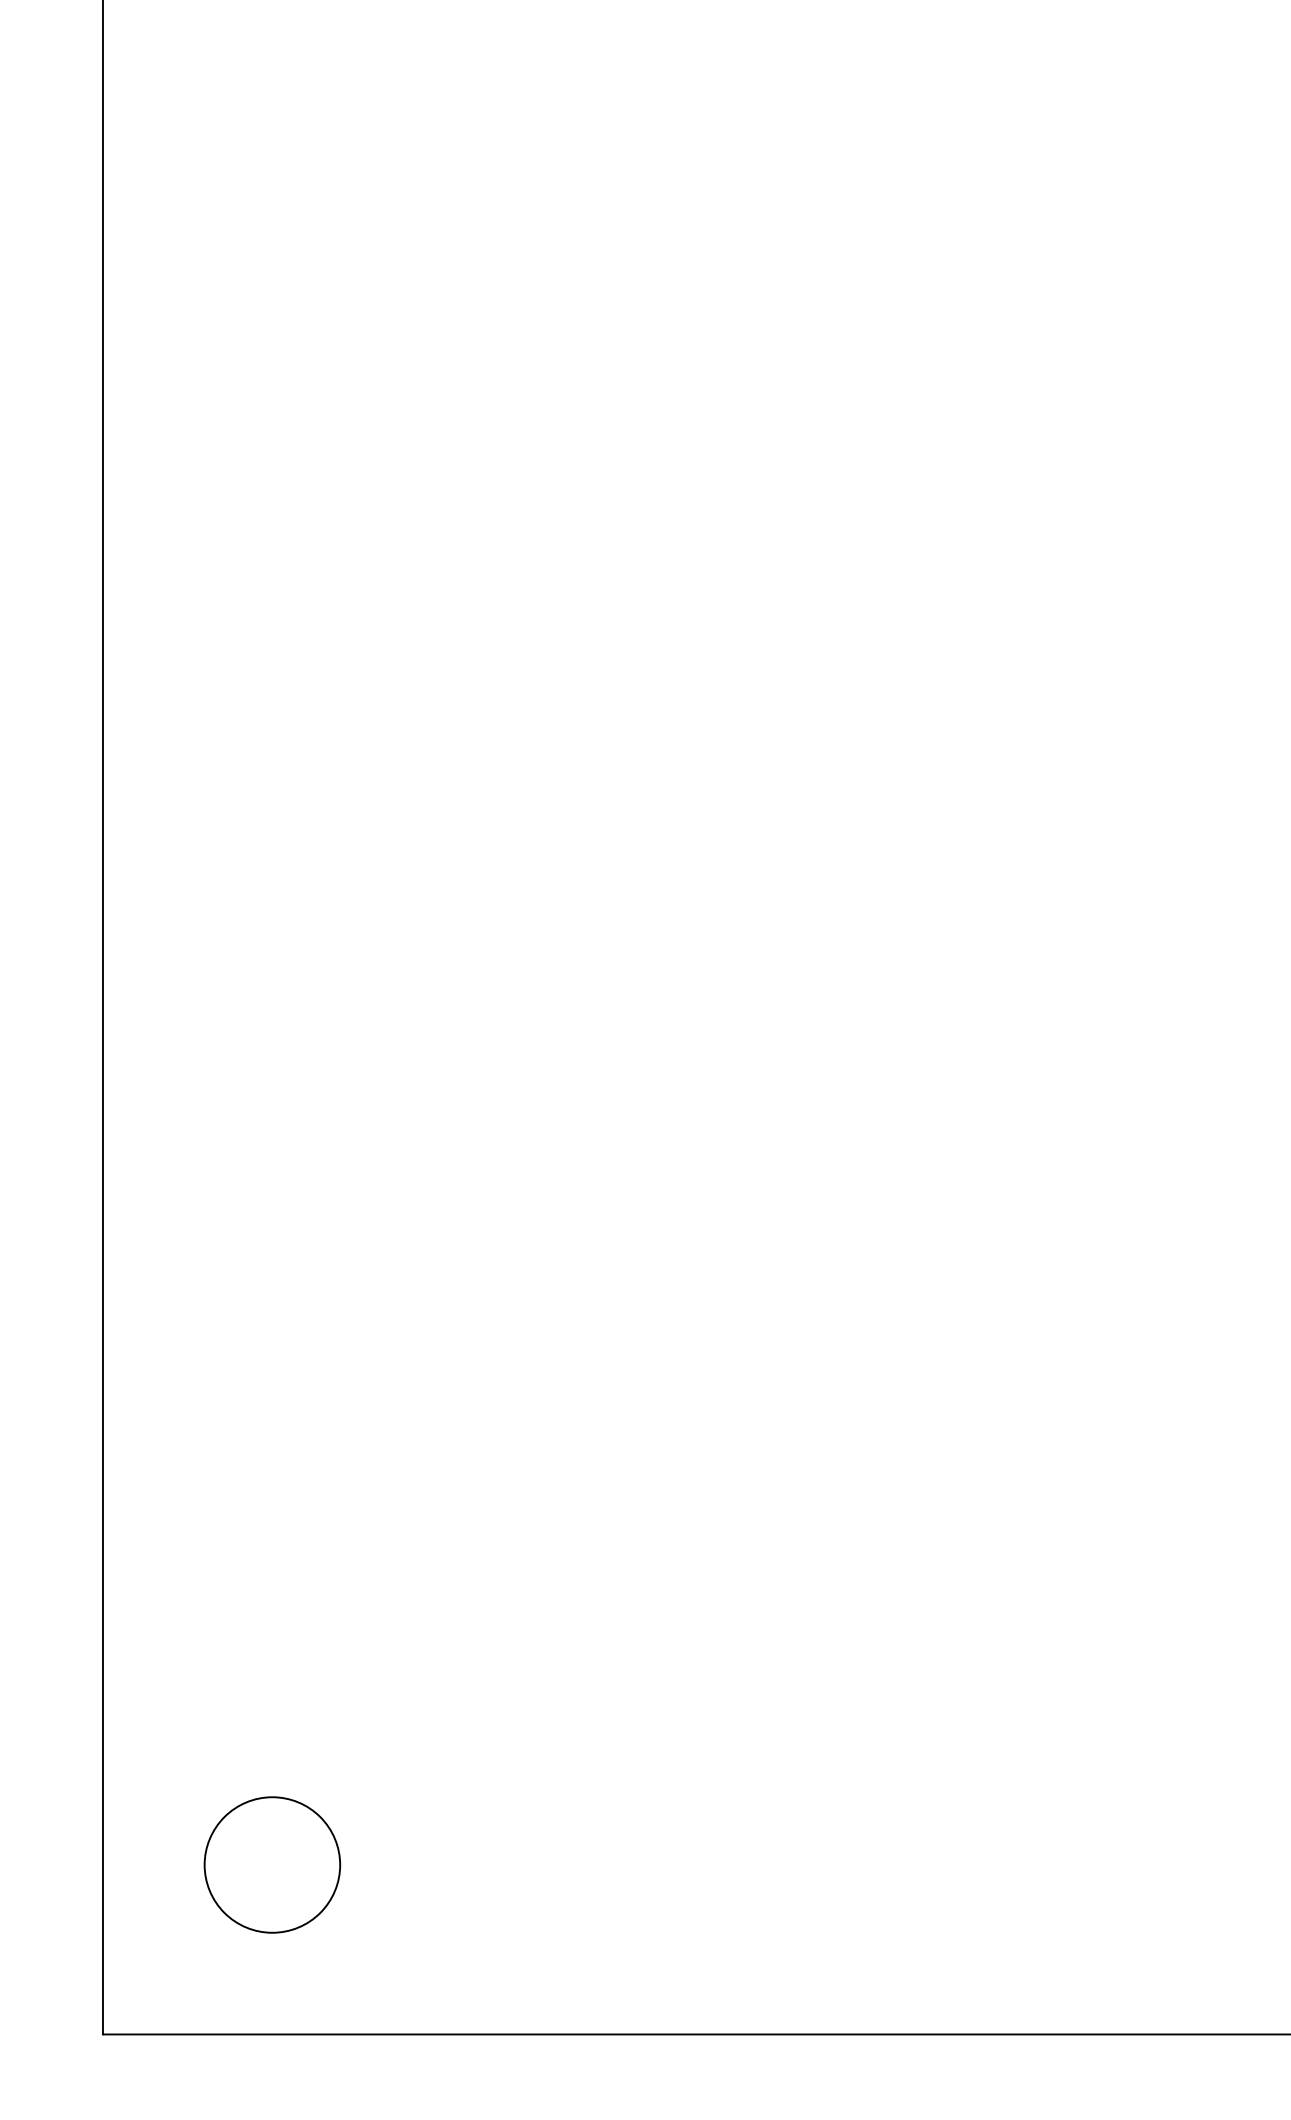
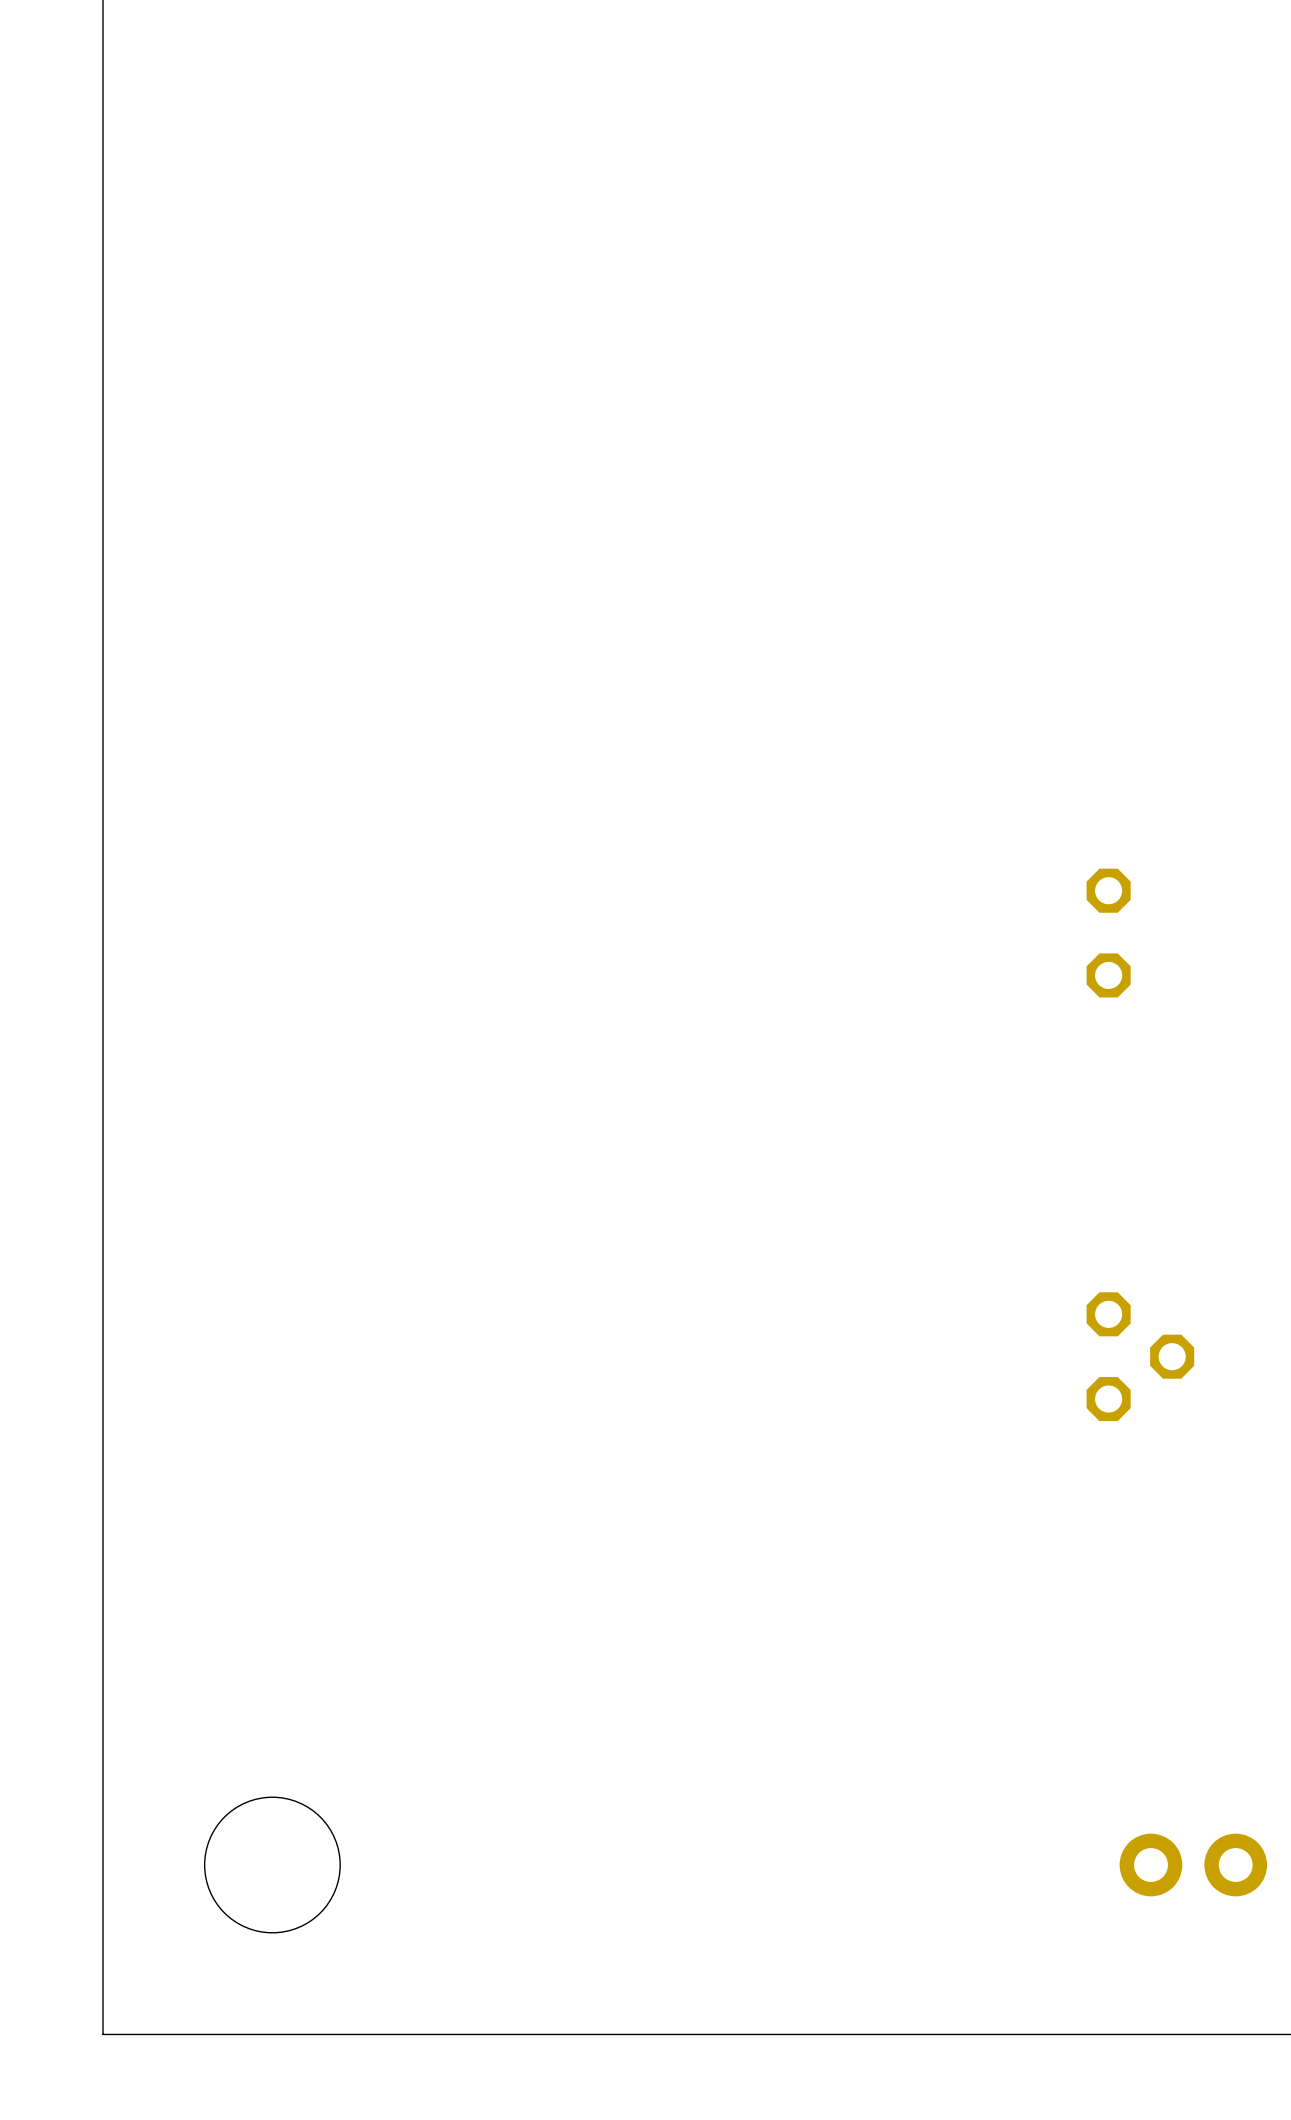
part: none -> (1108, 933)
part: none -> (1140, 1356)
part: none -> (1193, 1865)

